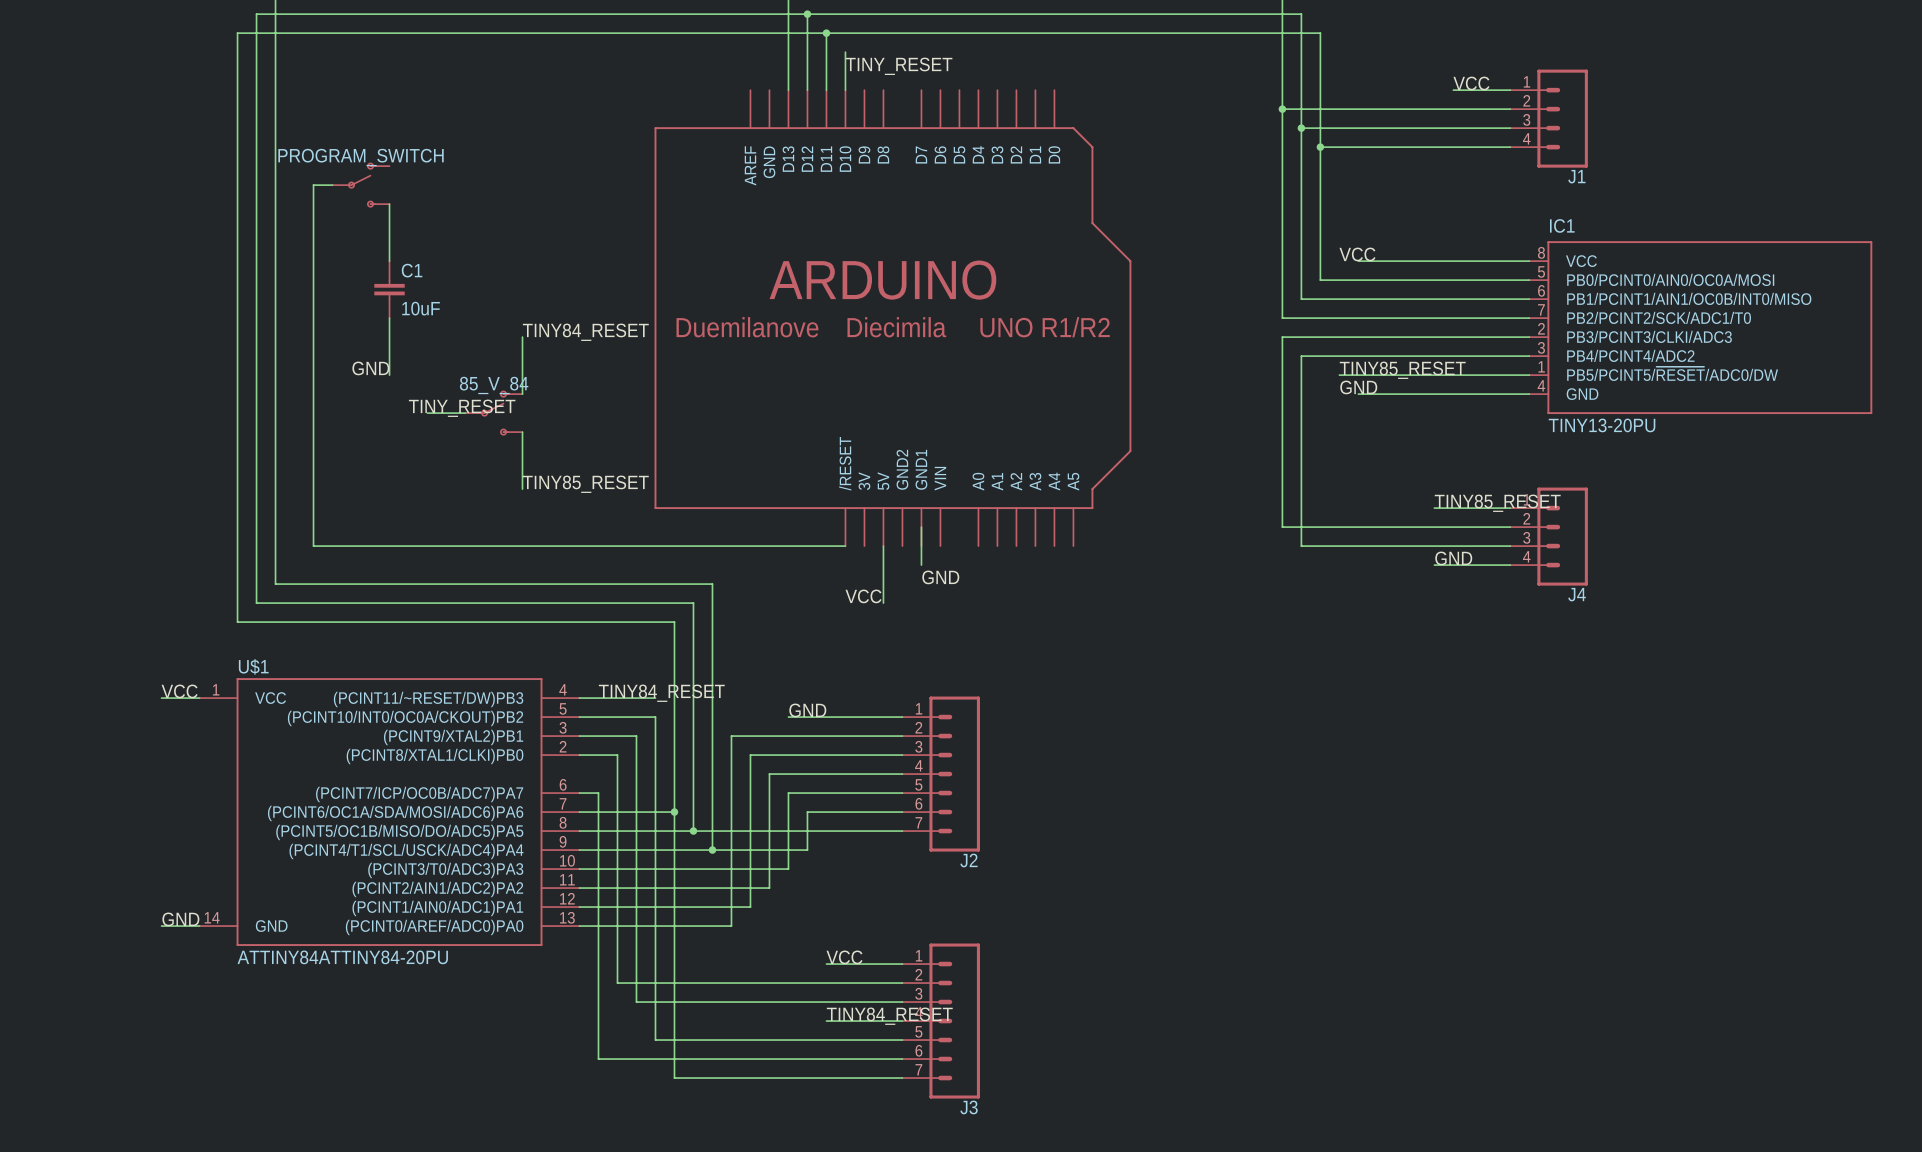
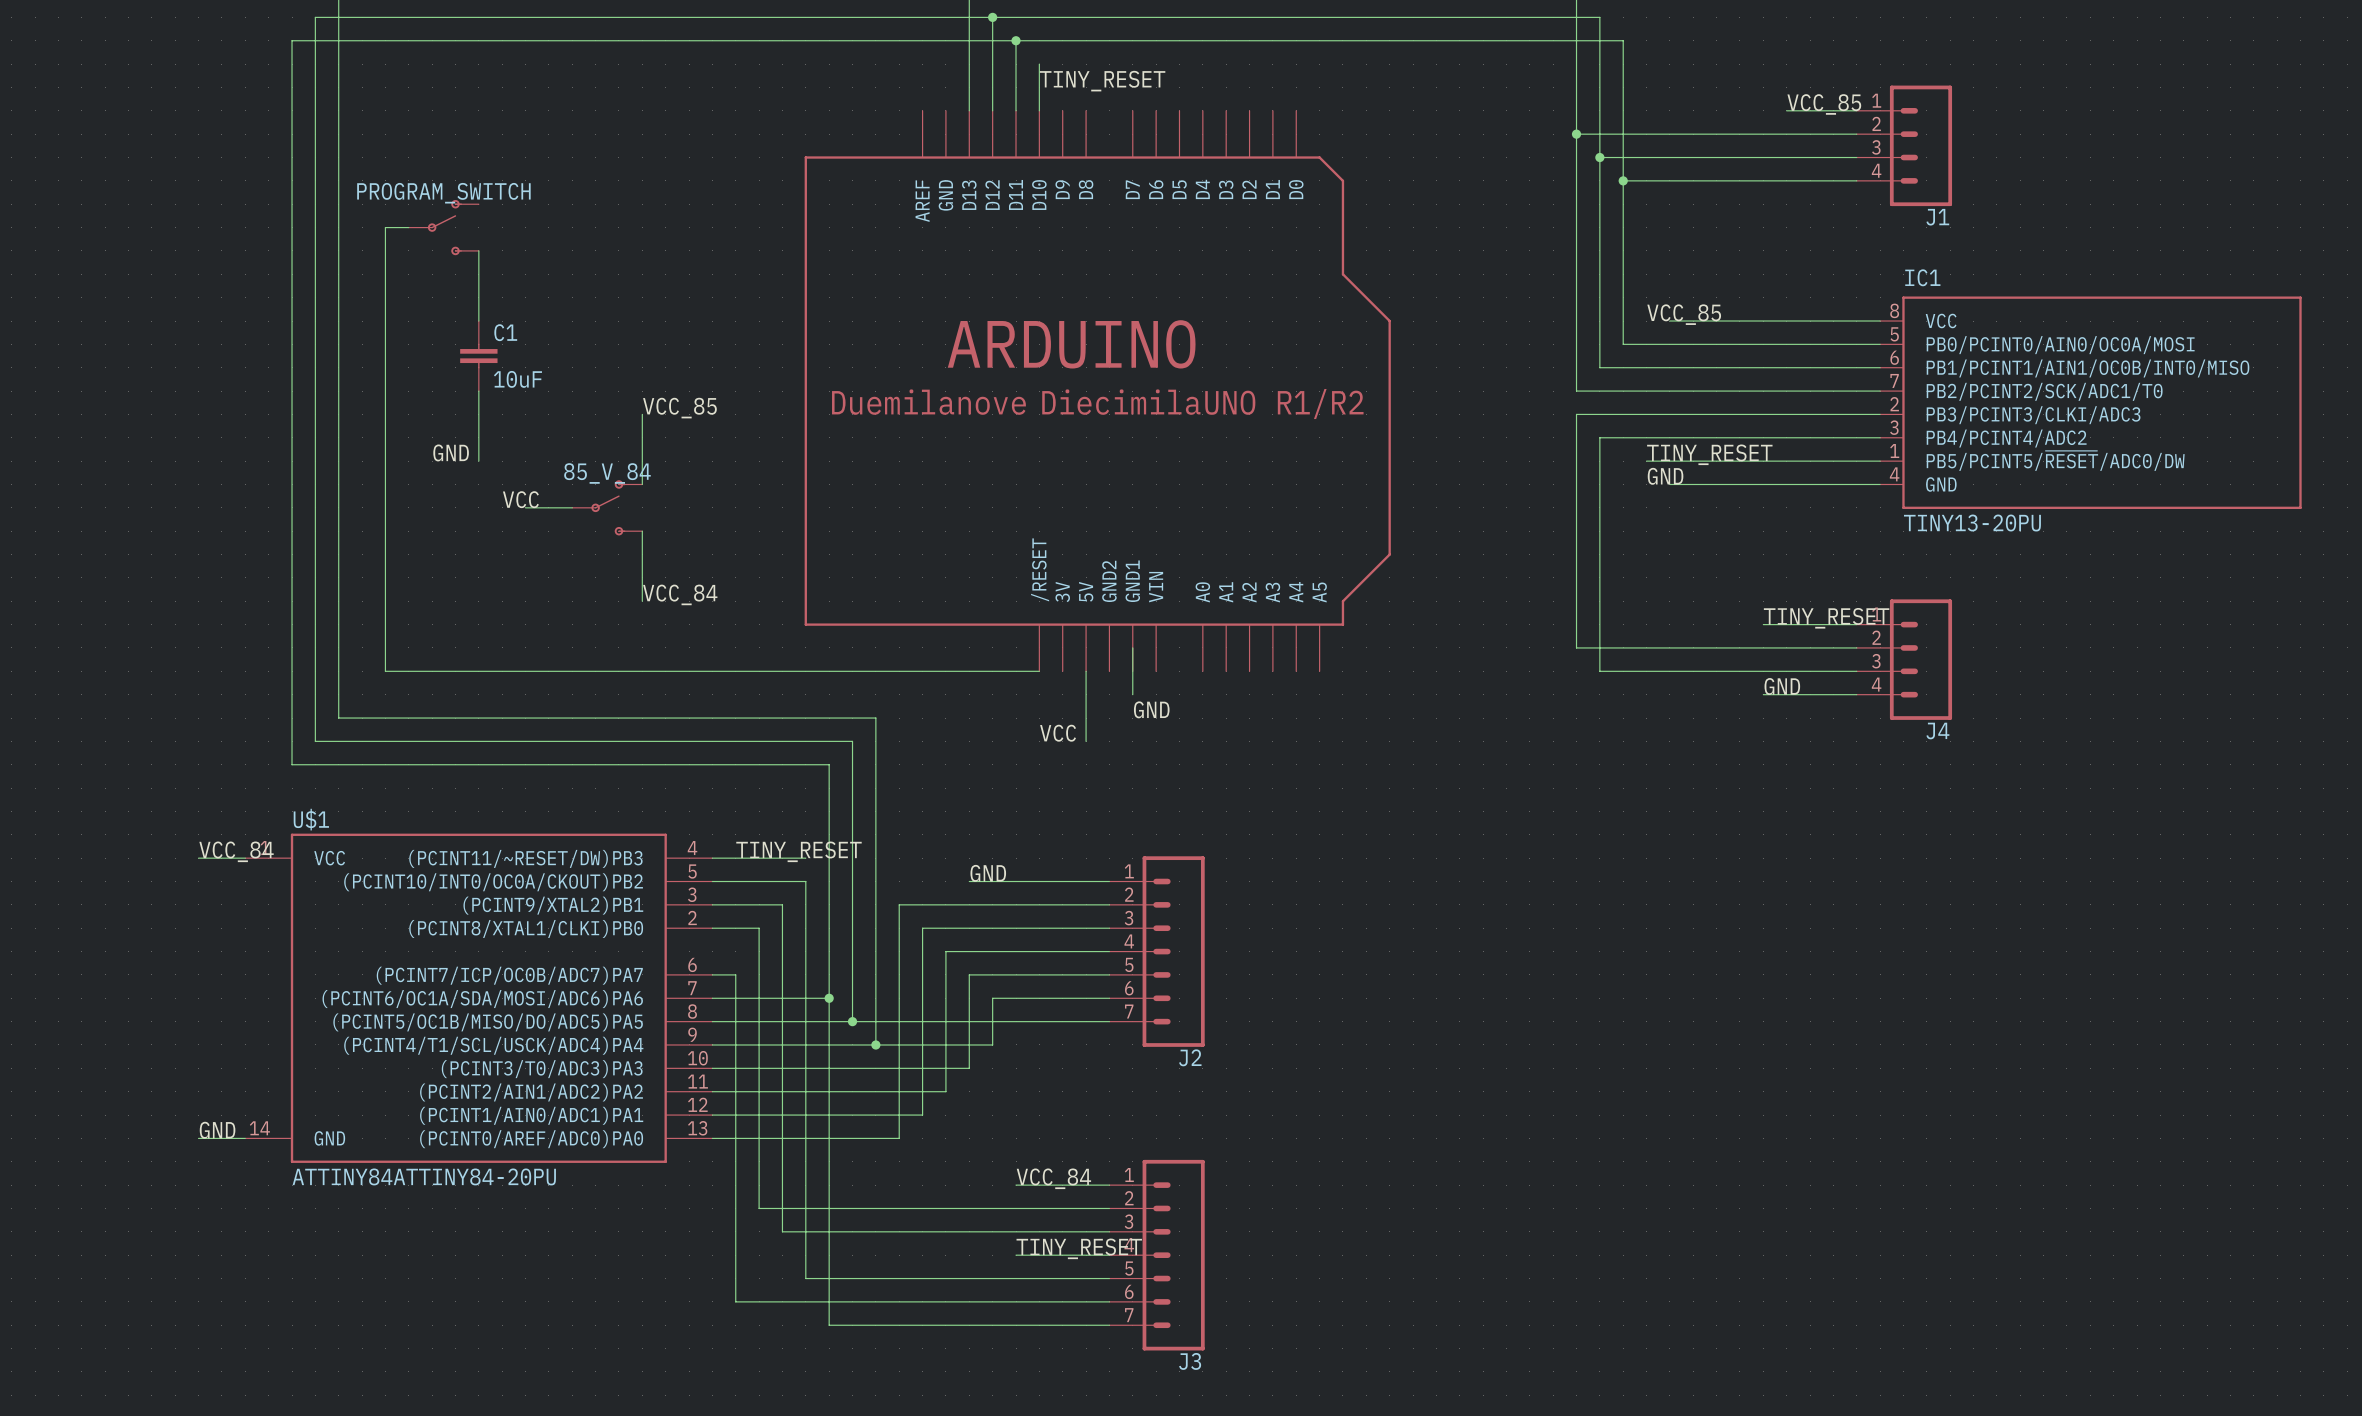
label: VCC (1471, 83) -> VCC_85 (1824, 104)
label: VCC (1357, 254) -> VCC_85 (1684, 314)
label: TINY84_RESET (585, 332) -> VCC_85 (679, 408)
label: TINY85_RESET (1402, 370) -> TINY_RESET (1709, 454)
label: TINY_RESET (462, 408) -> VCC (520, 499)
label: TINY85_RESET (585, 484) -> VCC_84 (680, 594)
label: TINY85_RESET (1497, 503) -> TINY_RESET (1826, 618)
label: VCC (179, 691) -> VCC_84 (236, 851)
label: TINY84_RESET (661, 693) -> TINY_RESET (798, 851)
label: VCC (844, 957) -> VCC_84 (1053, 1178)
label: TINY84_RESET (889, 1016) -> TINY_RESET (1079, 1248)

